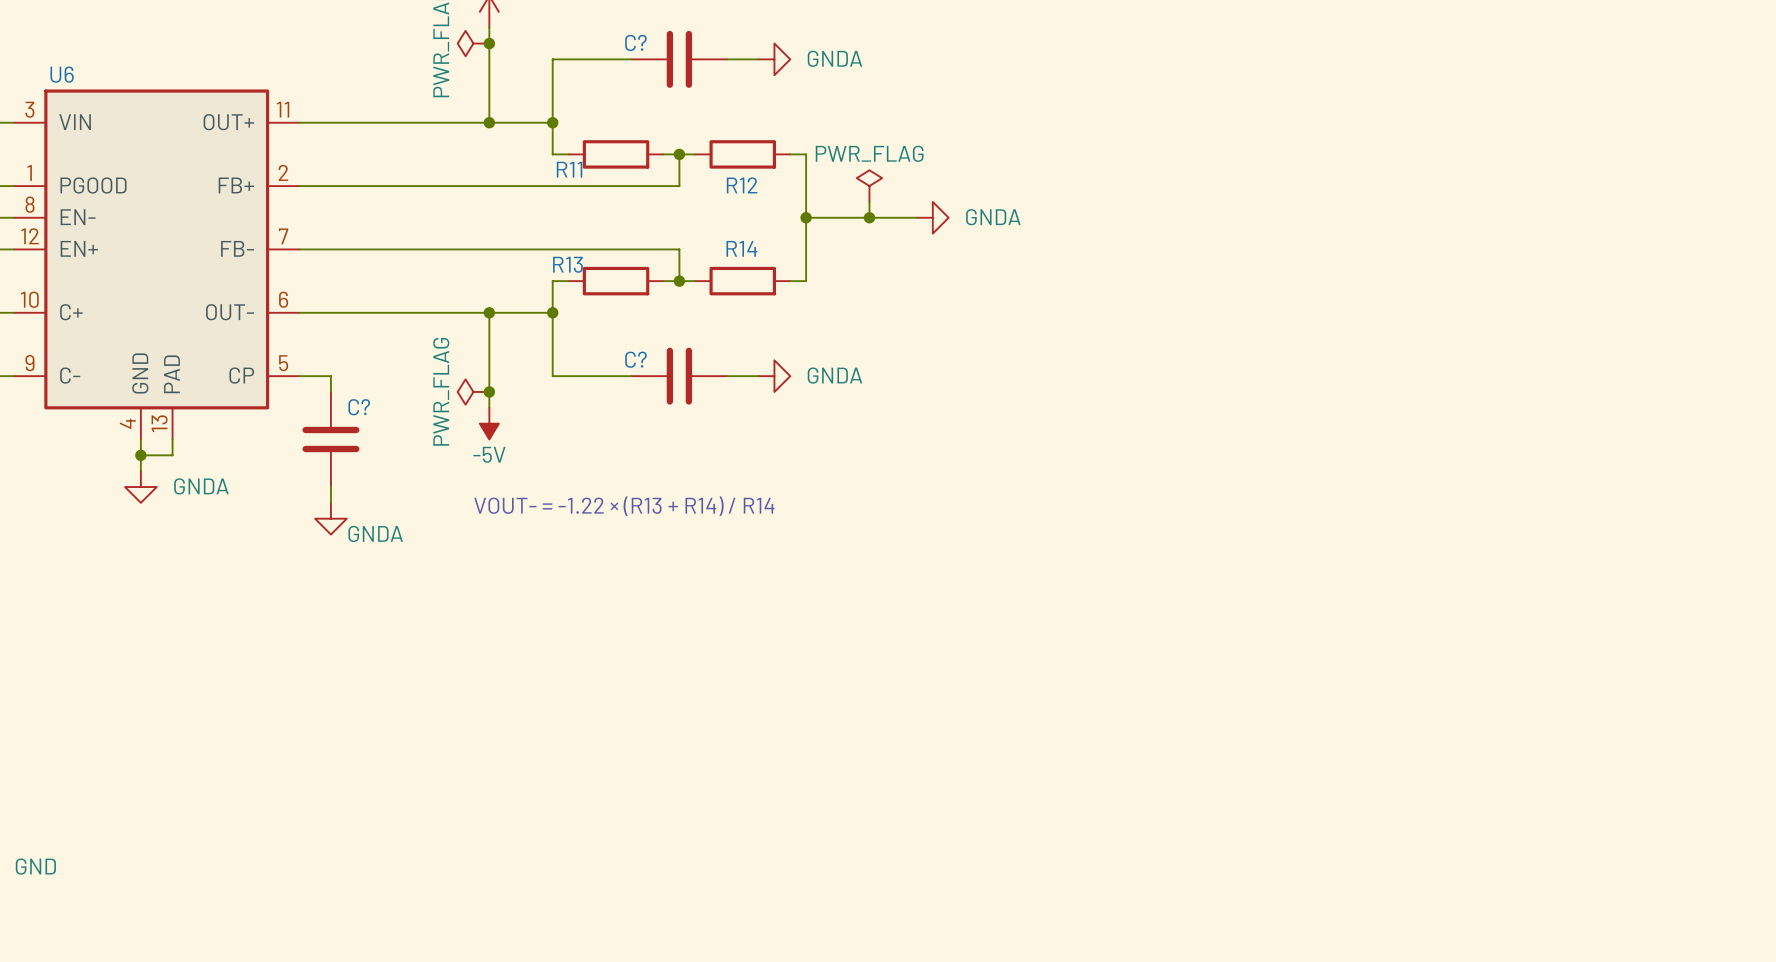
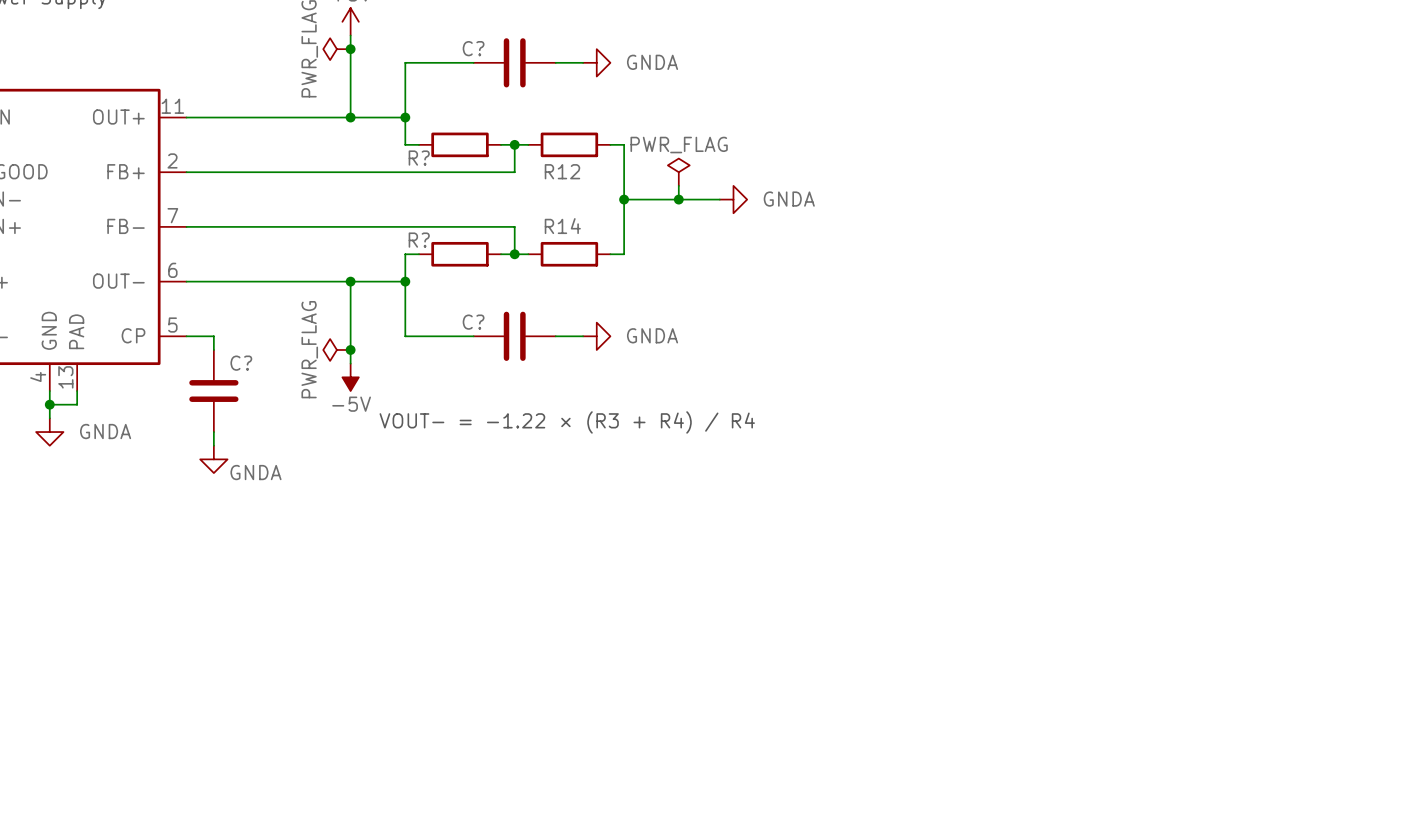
R11 name: R11 (569, 169) -> R? (419, 158)
R13 name: R13 (567, 264) -> R? (419, 240)
text: VOUT- = -1.22 × (R13 + R14) / R14 (624, 506) -> VOUT- = -1.22 × (R3 + R4) / R4 (567, 422)

